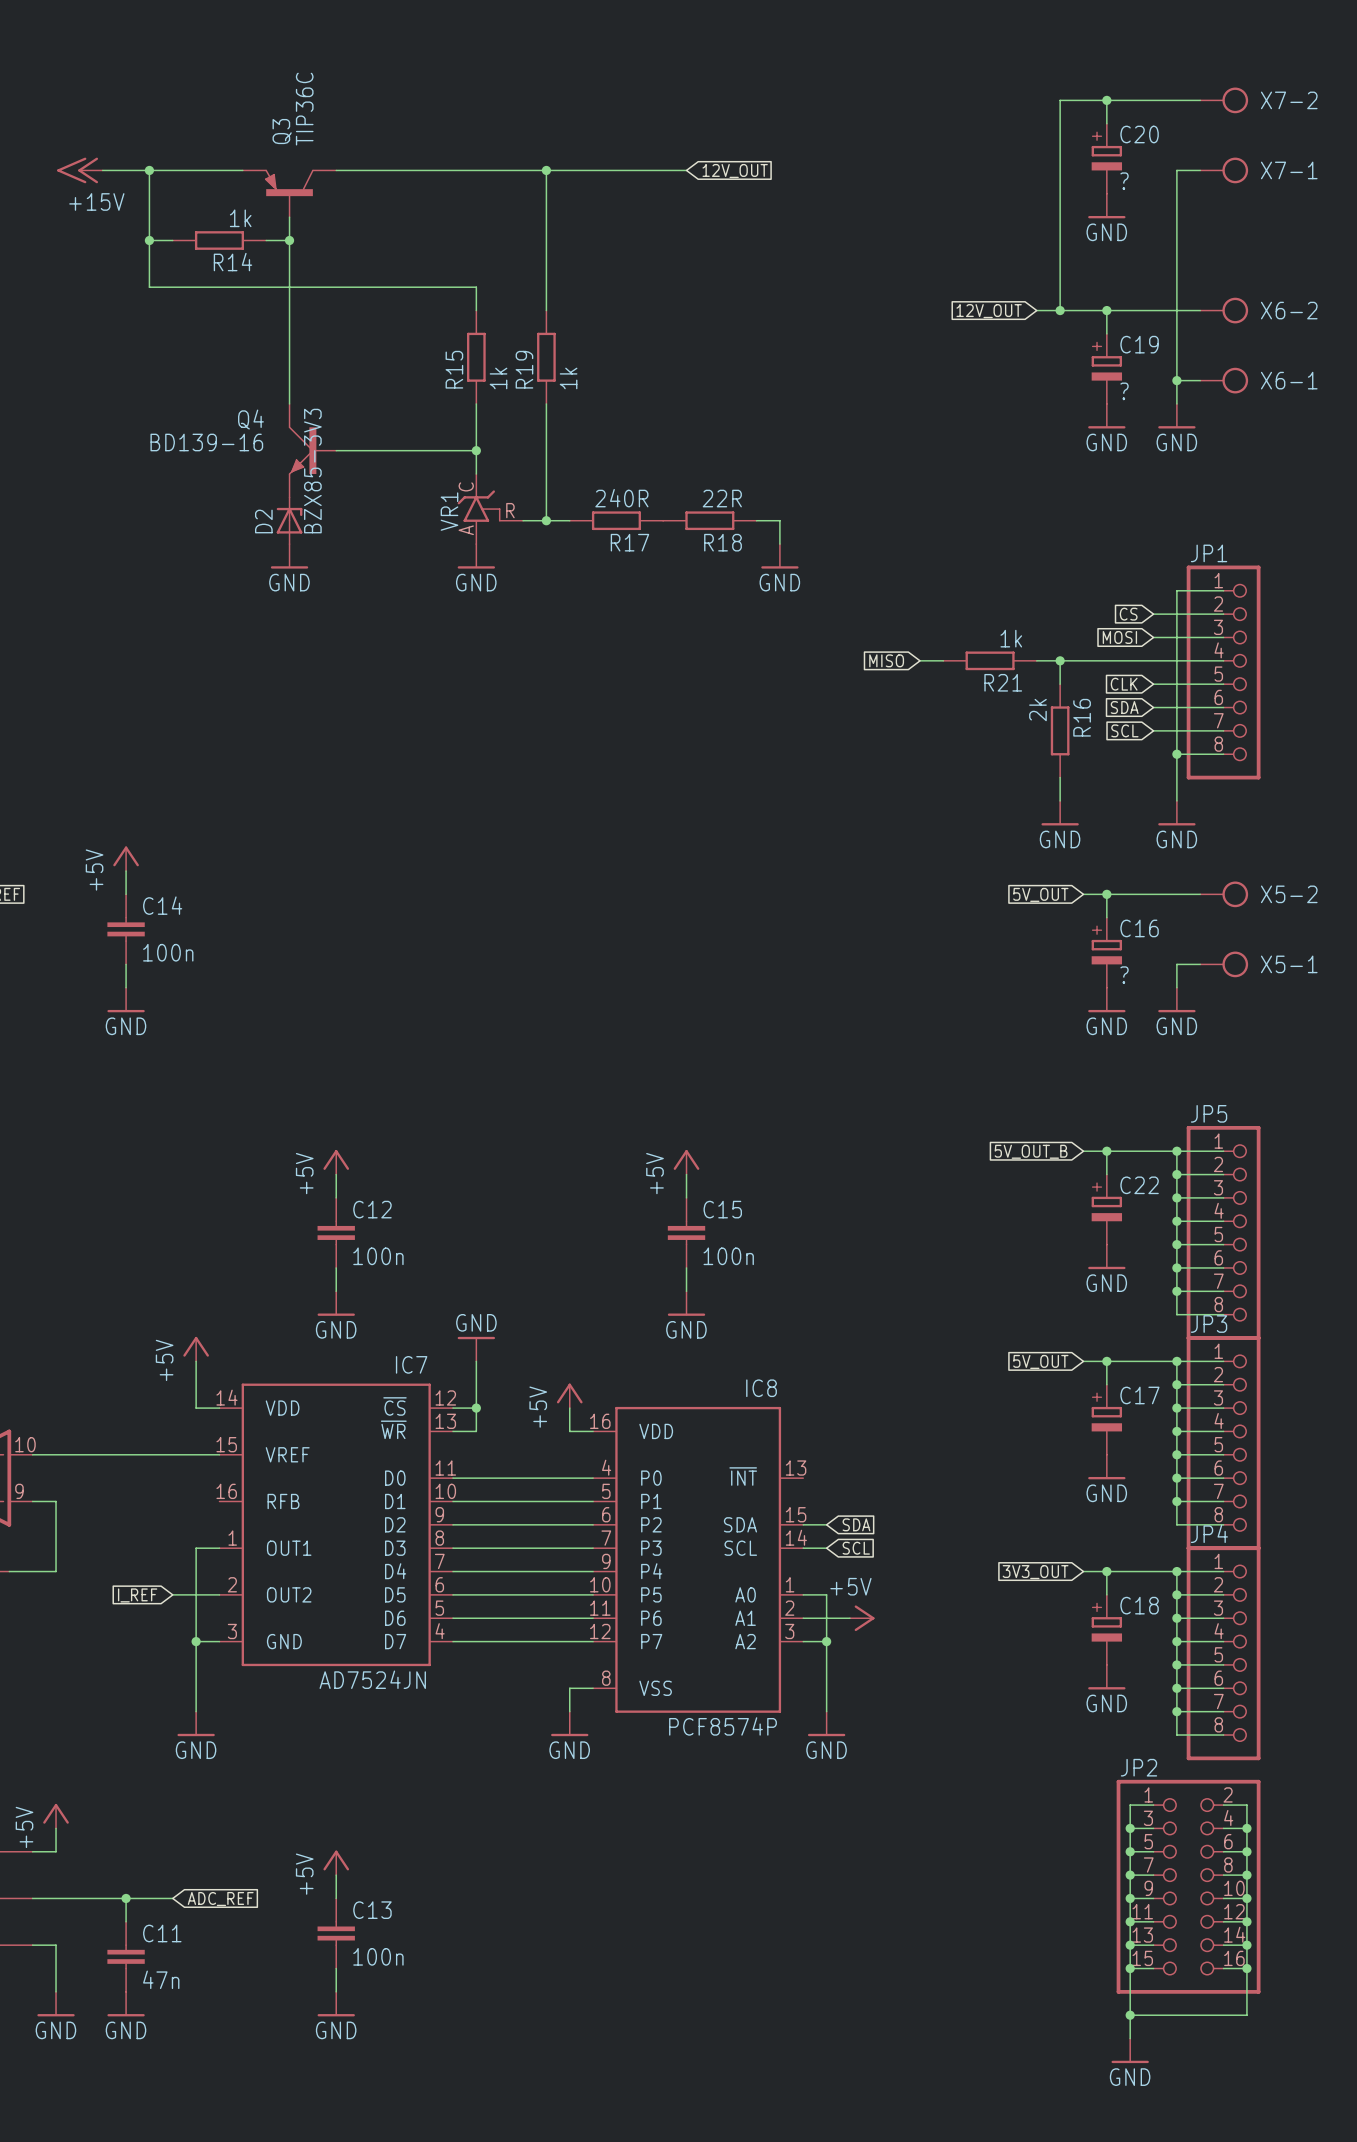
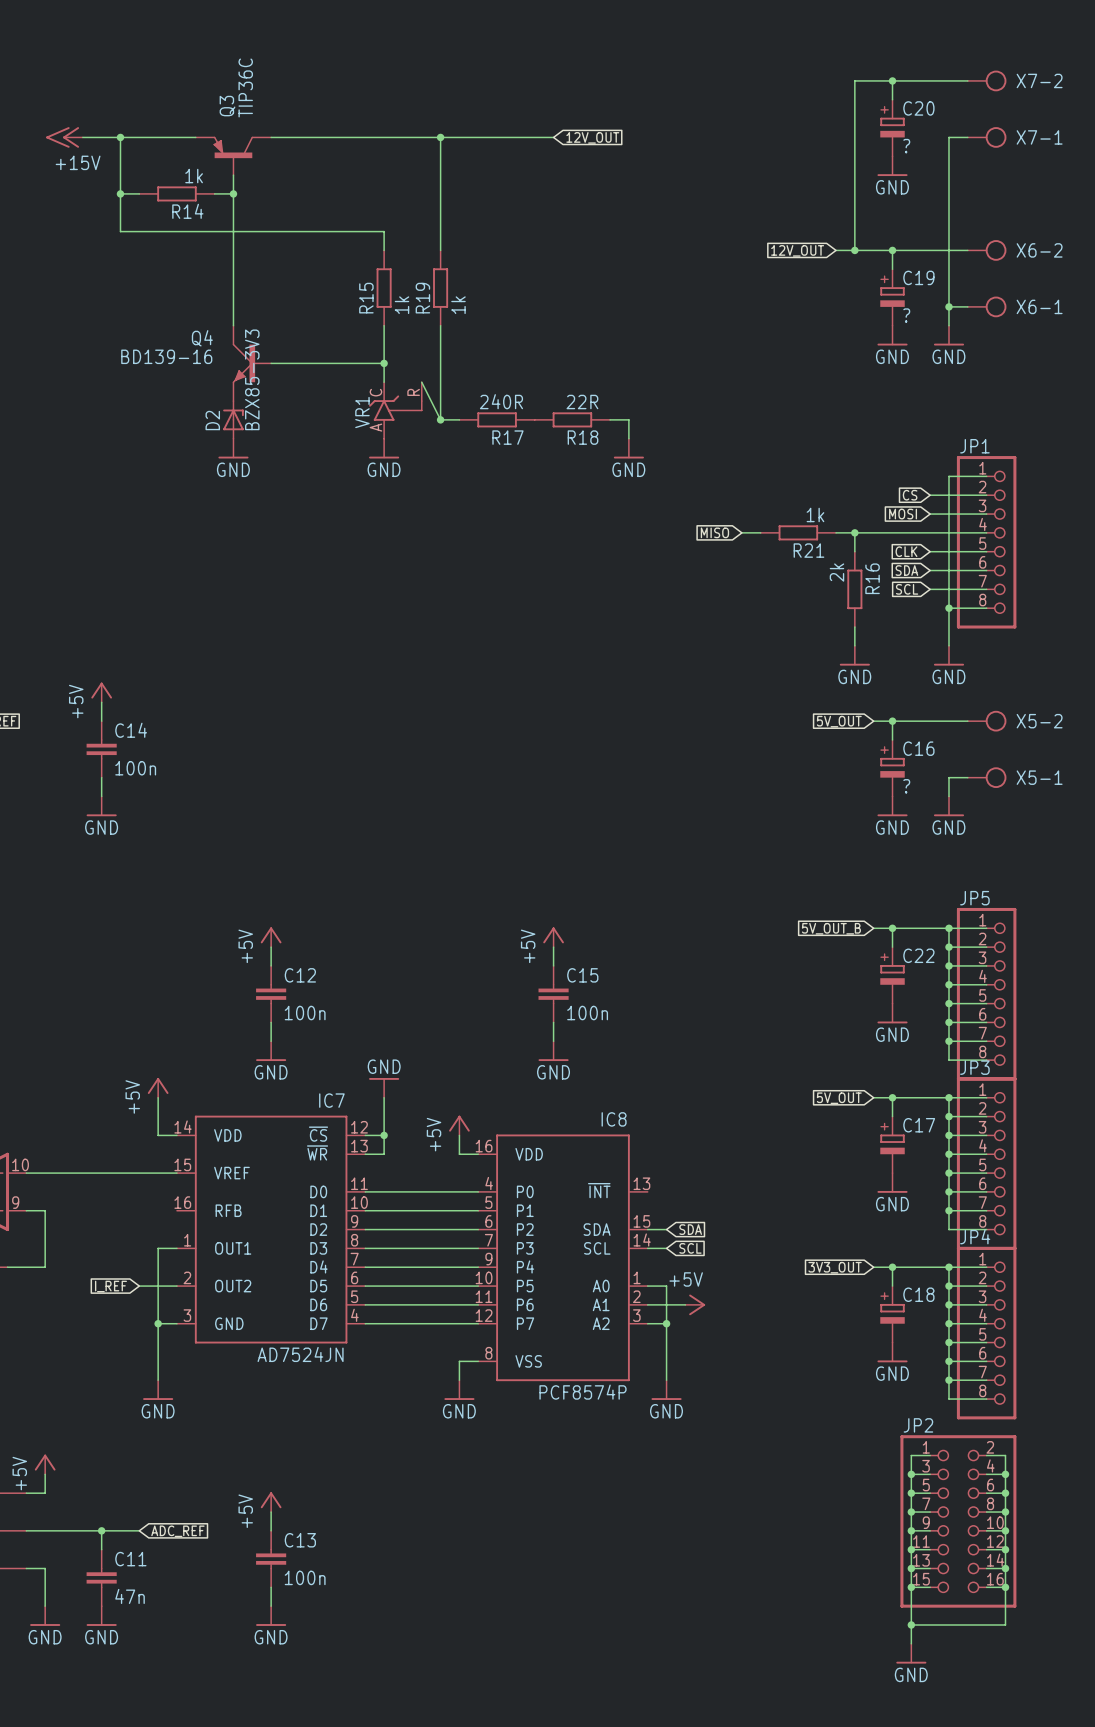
VR1 symbol: [457, 474, 524, 545] -> [369, 382, 423, 439]
wire: (523, 520) (546, 520) -> (421, 382) (440, 419)

